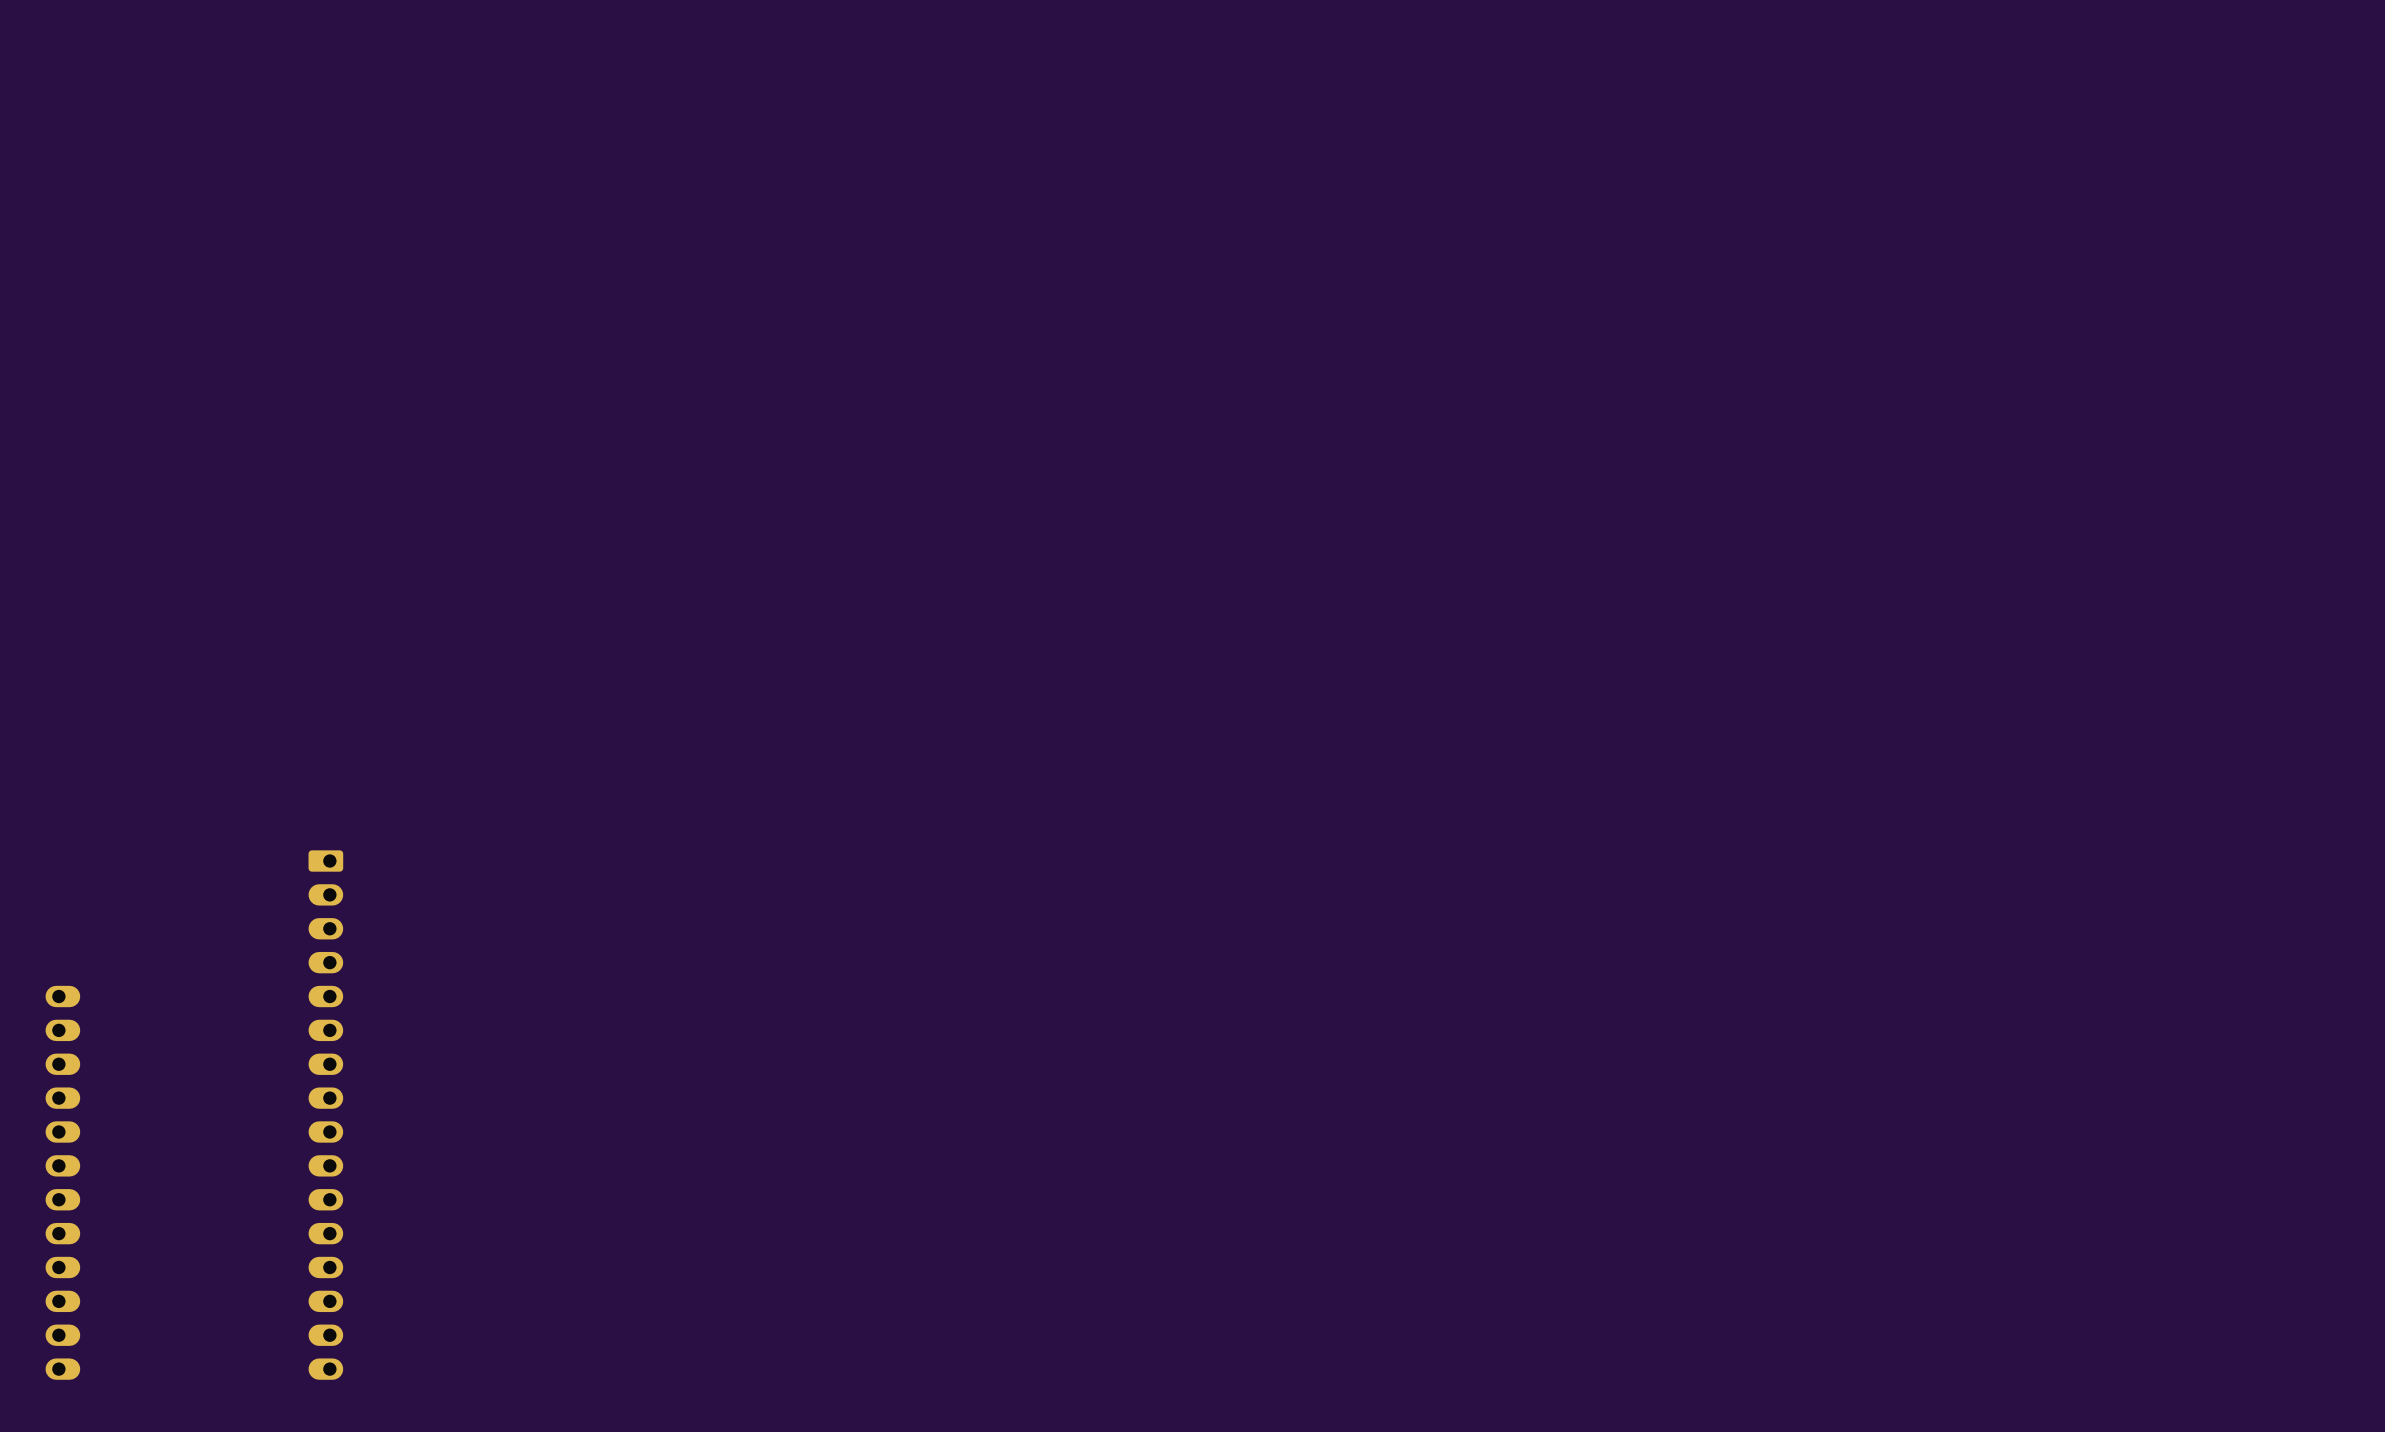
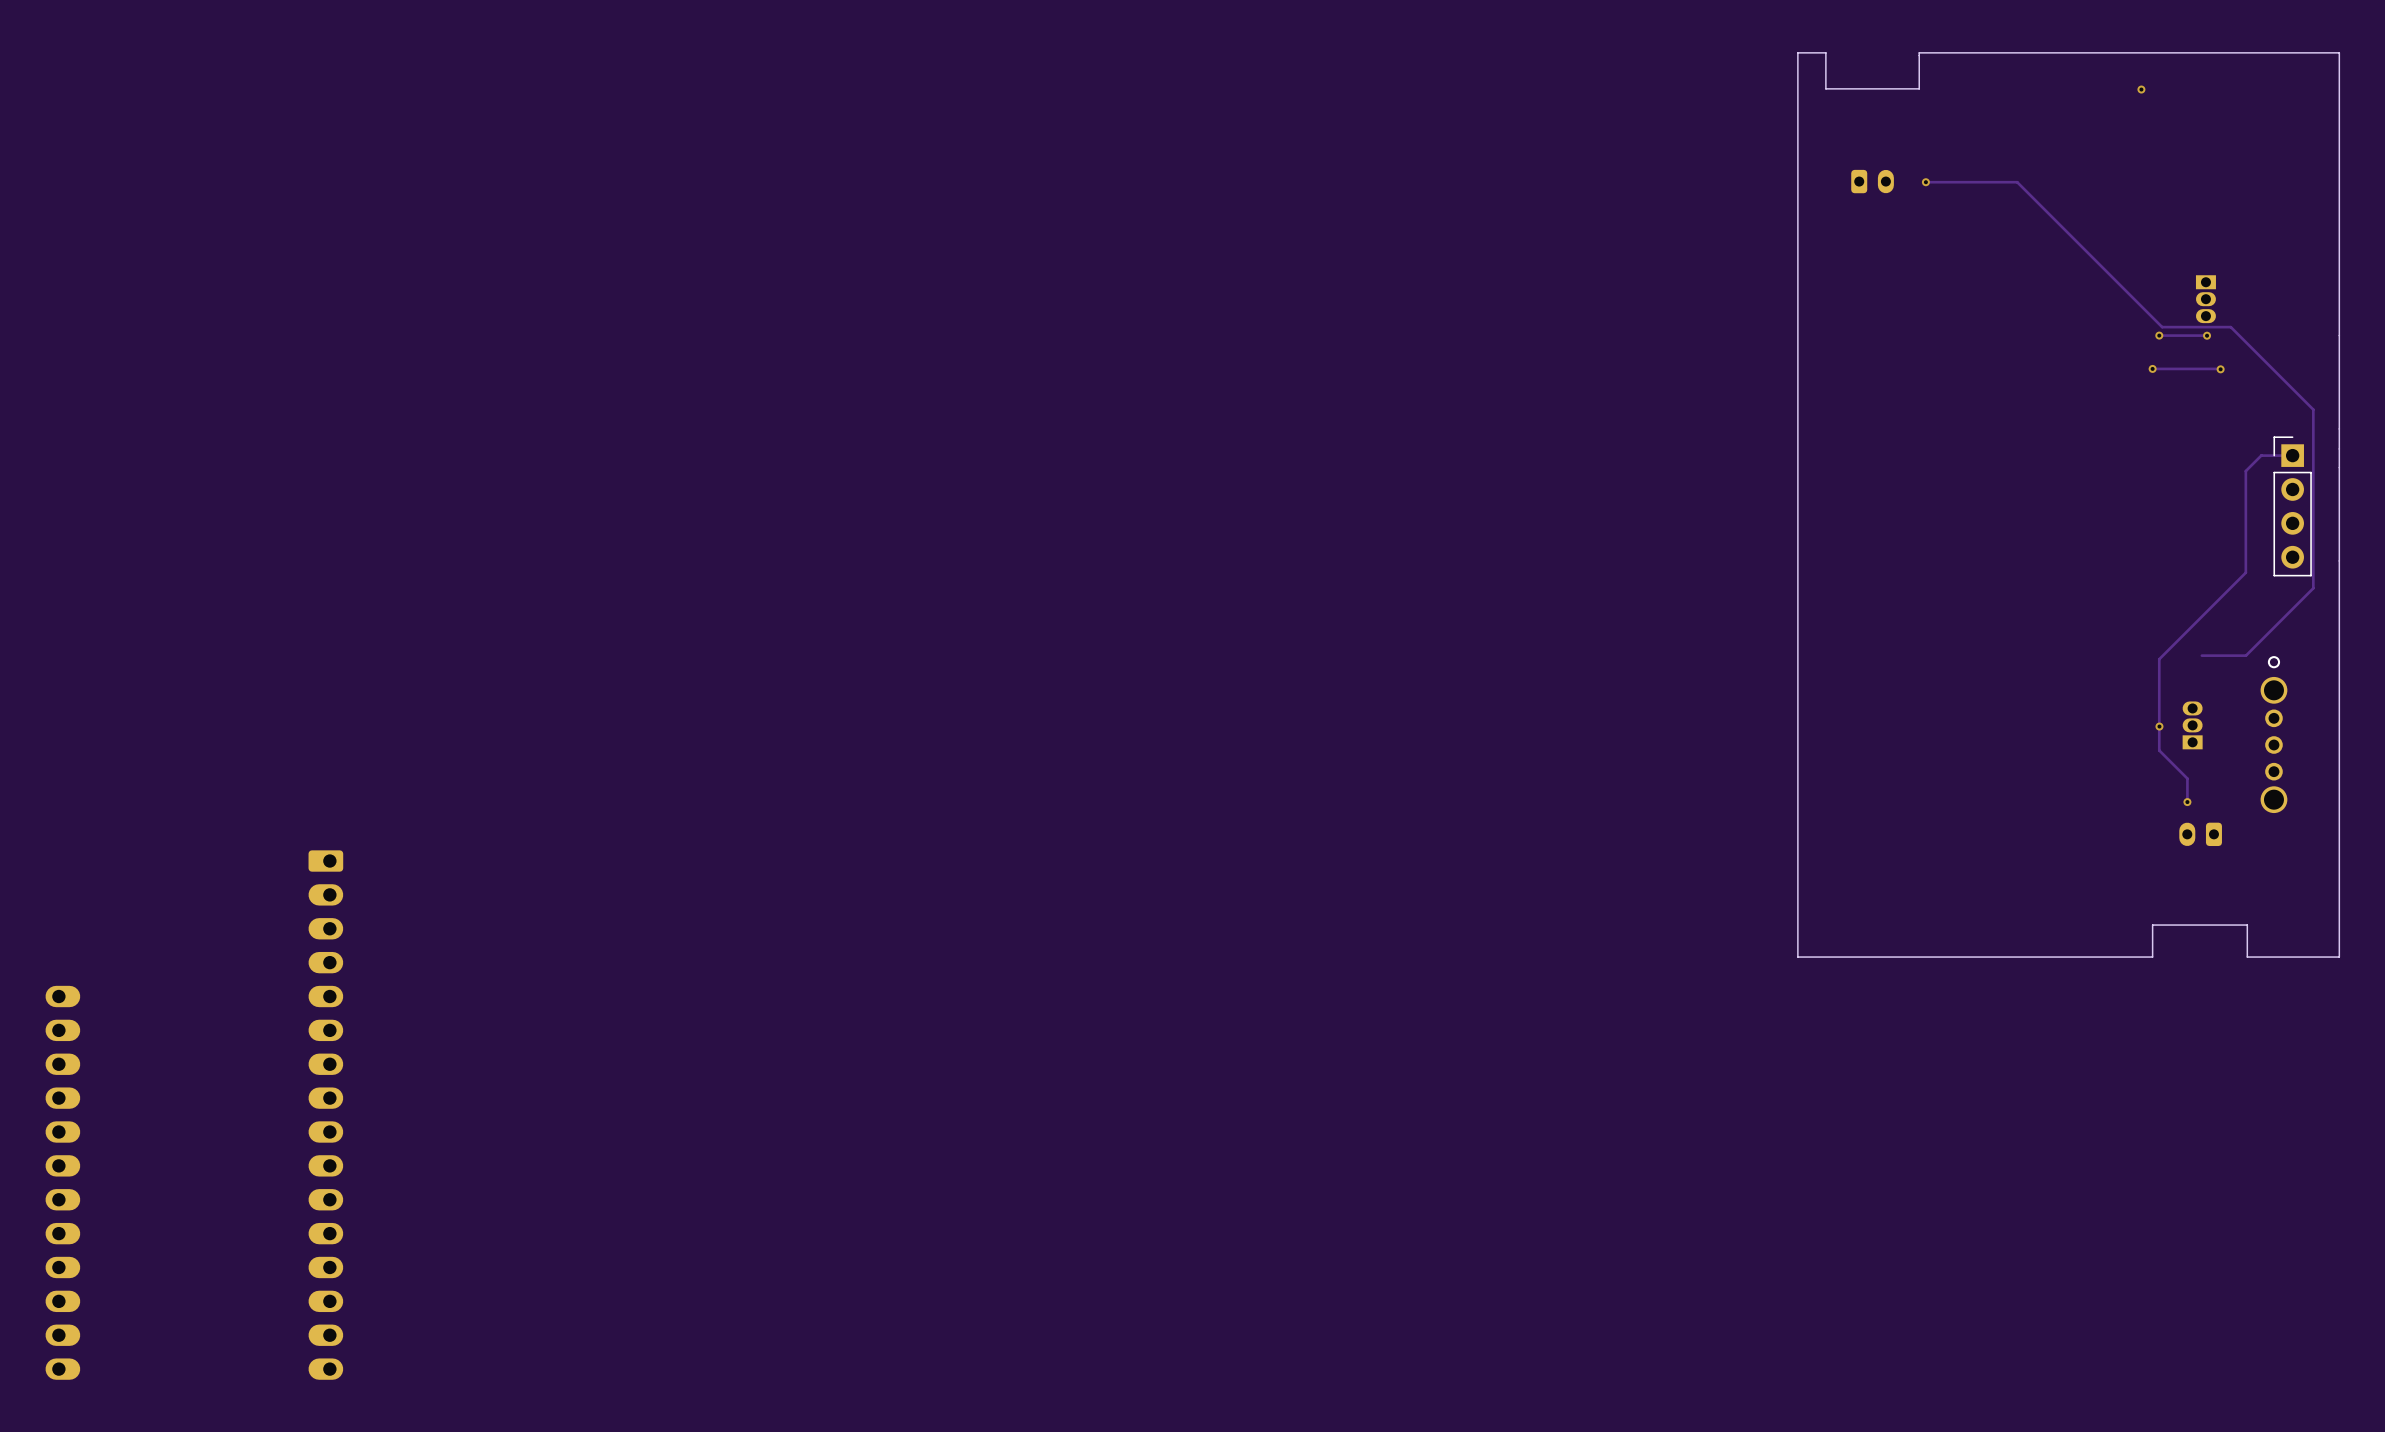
board edge: none -> (2339, 52) (2339, 957) (2247, 957) (2247, 925) (2152, 925) (2152, 957) (1797, 957) (1797, 52) (1825, 52) (1825, 88) (1919, 88) (1919, 52) (2339, 52)
via: none -> (2141, 89)
part: none -> (1872, 181)
track: none -> (1925, 182) (2017, 182) (2162, 327) (2230, 327) (2313, 409) (2313, 588) (2245, 655) (2201, 655)
via: none -> (1925, 182)
part: none -> (2205, 299)
via: none -> (2159, 335)
track: none -> (2206, 335) (2159, 335) (2160, 336)
via: none -> (2207, 335)
track: none -> (2152, 368) (2220, 369)
via: none -> (2152, 368)
via: none -> (2220, 369)
track: none -> (2292, 455) (2261, 455) (2245, 471) (2245, 572) (2159, 659) (2159, 750) (2187, 778) (2187, 802)
part: none -> (2292, 506)
part: none -> (2192, 725)
via: none -> (2159, 726)
part: none -> (2273, 734)
via: none -> (2187, 802)
part: none -> (2200, 834)

